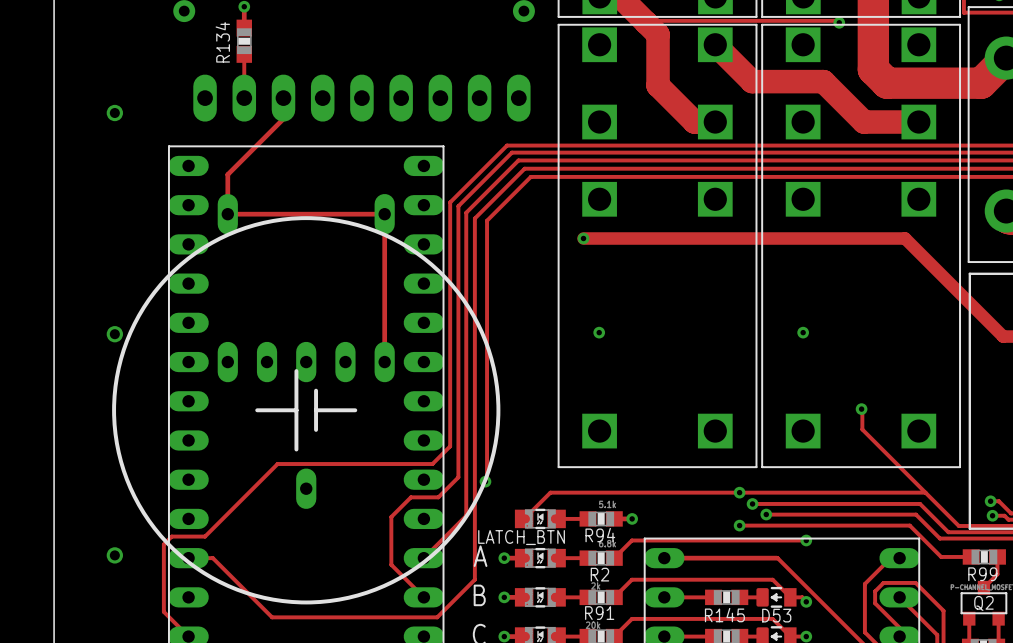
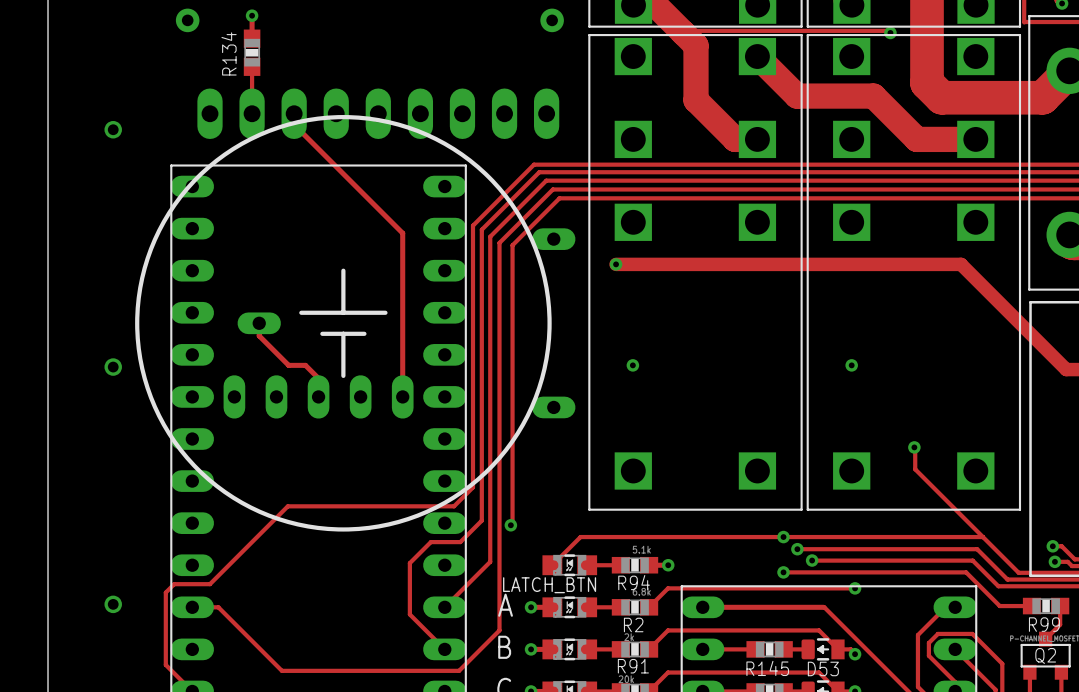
track: (283, 108) (283, 118) (227, 174) (227, 214) (384, 214) -> (294, 124) (402, 233) (402, 238)
track: none -> (259, 323) (259, 335) (288, 365) (305, 365) (318, 378) (318, 396)
part rotation: 0° (306, 399) -> 90° clockwise (355, 323)

